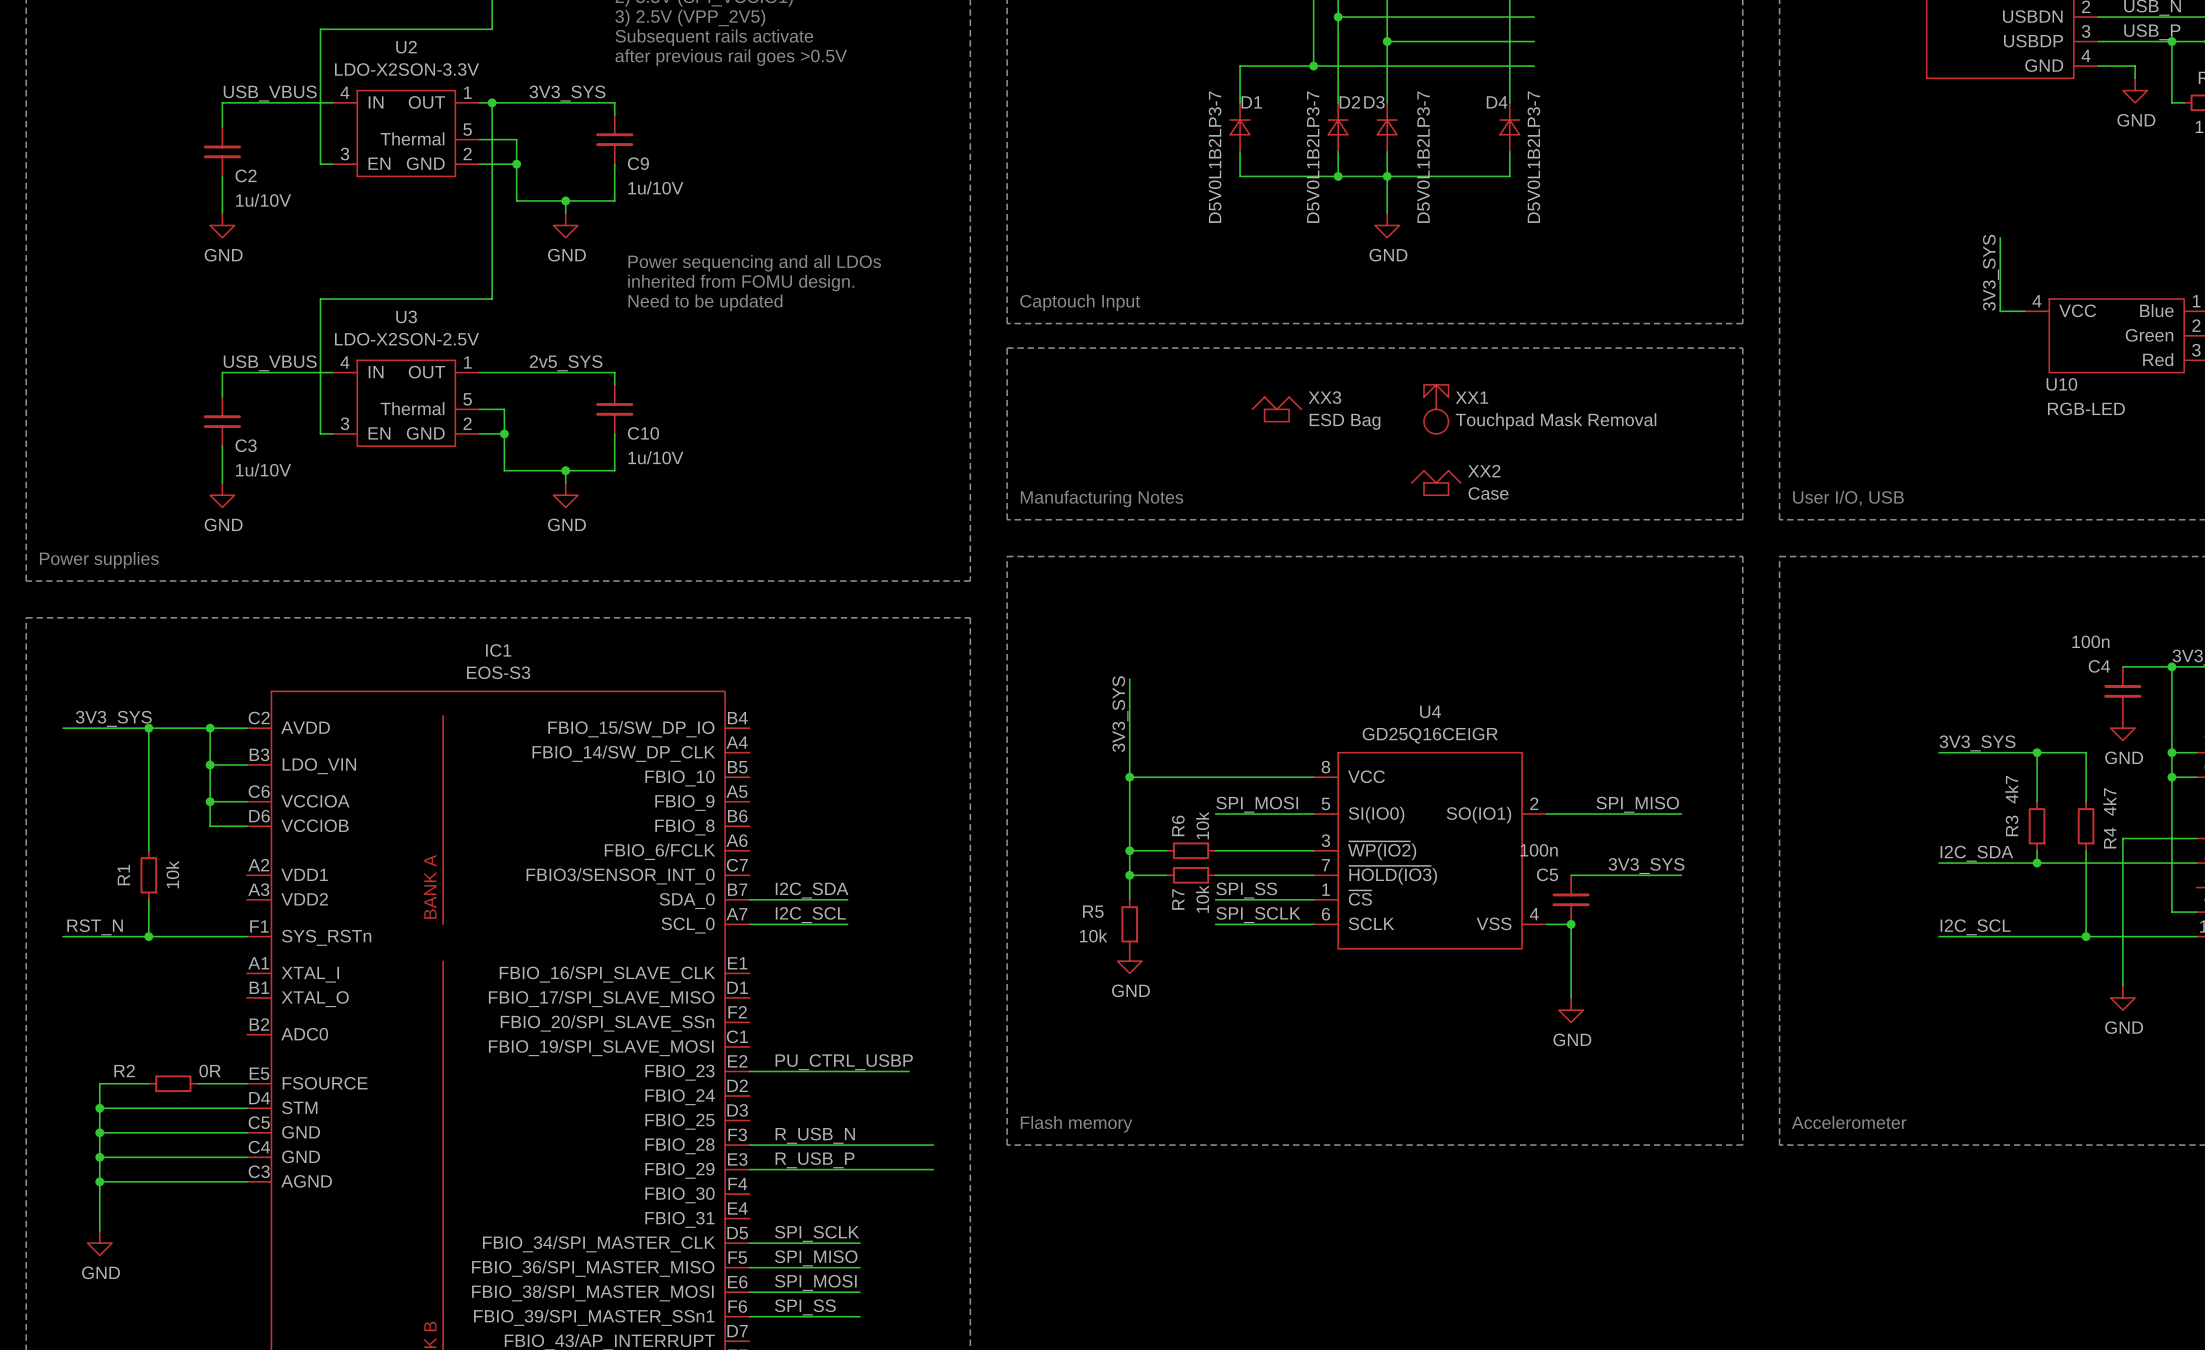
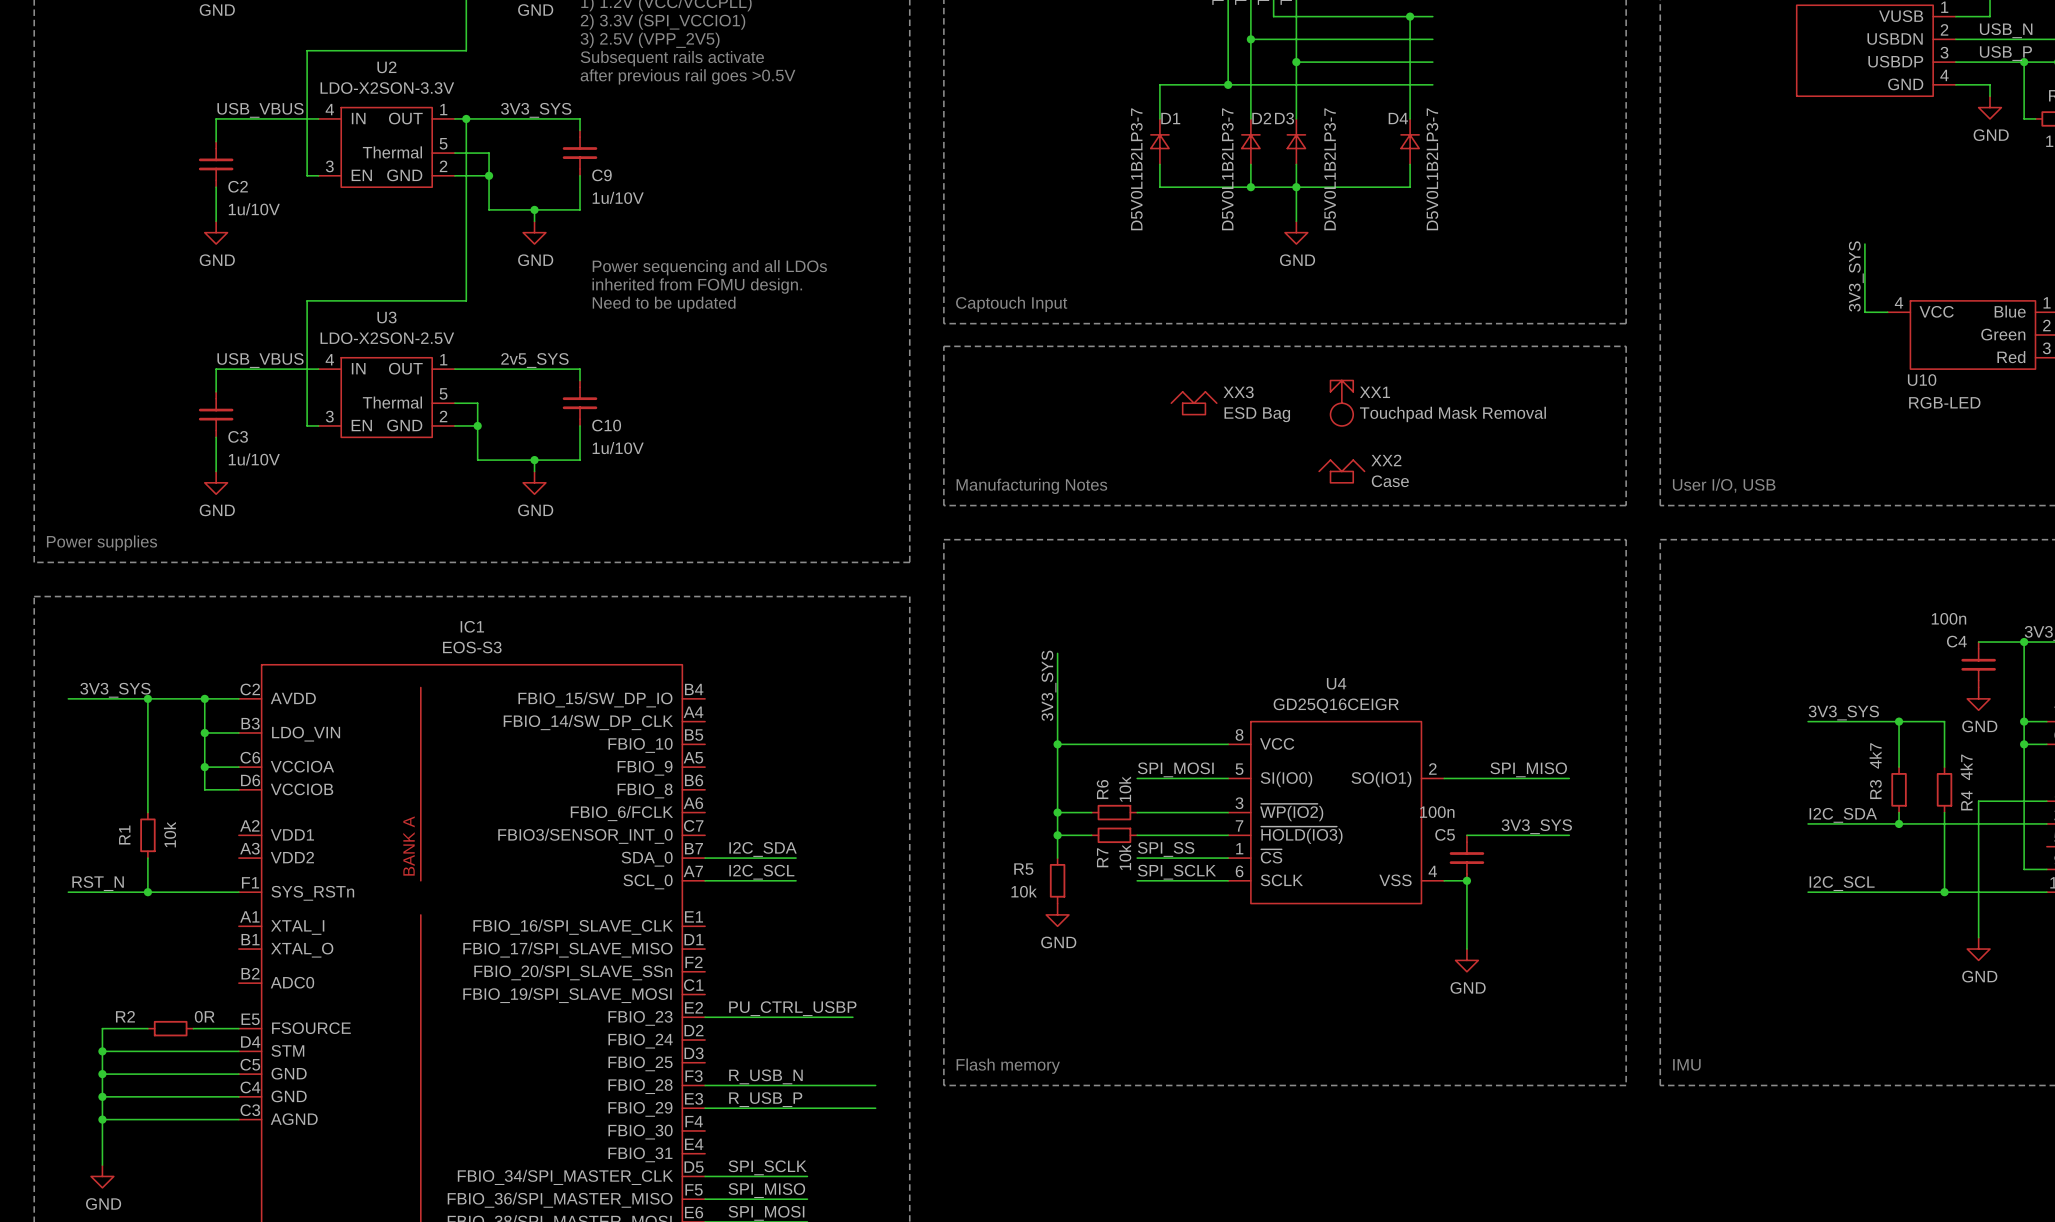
text: Accelerometer (1849, 1122) -> IMU (1686, 1064)

